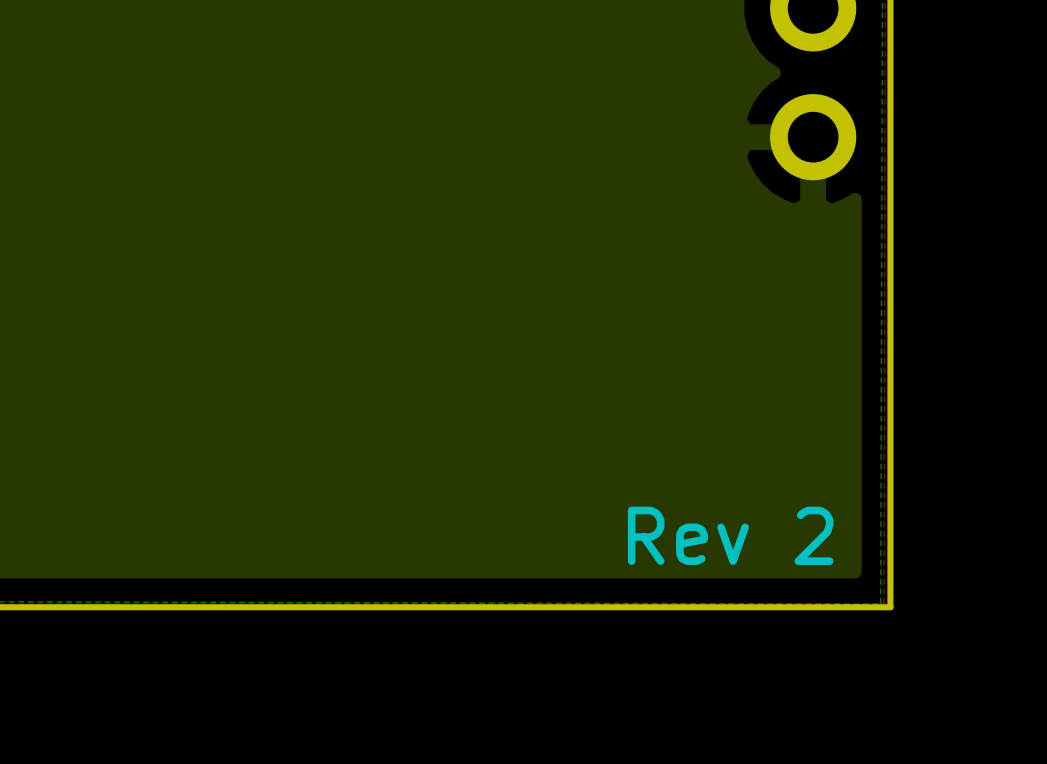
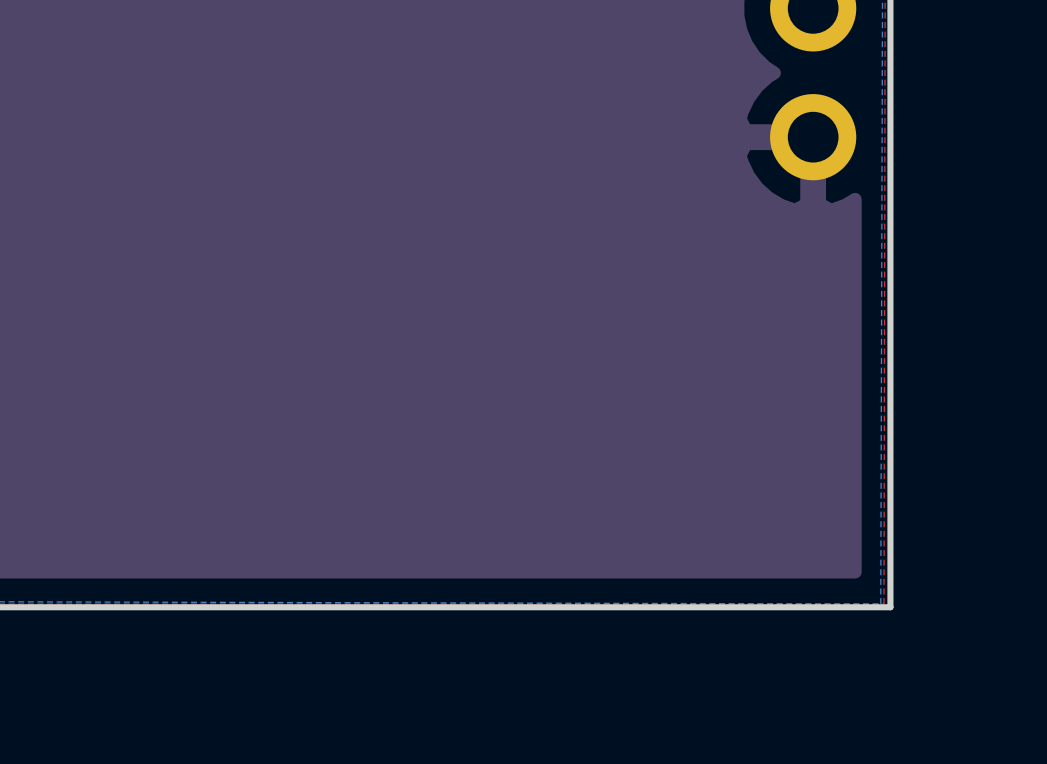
text: Rev 2 (730, 535) -> none

